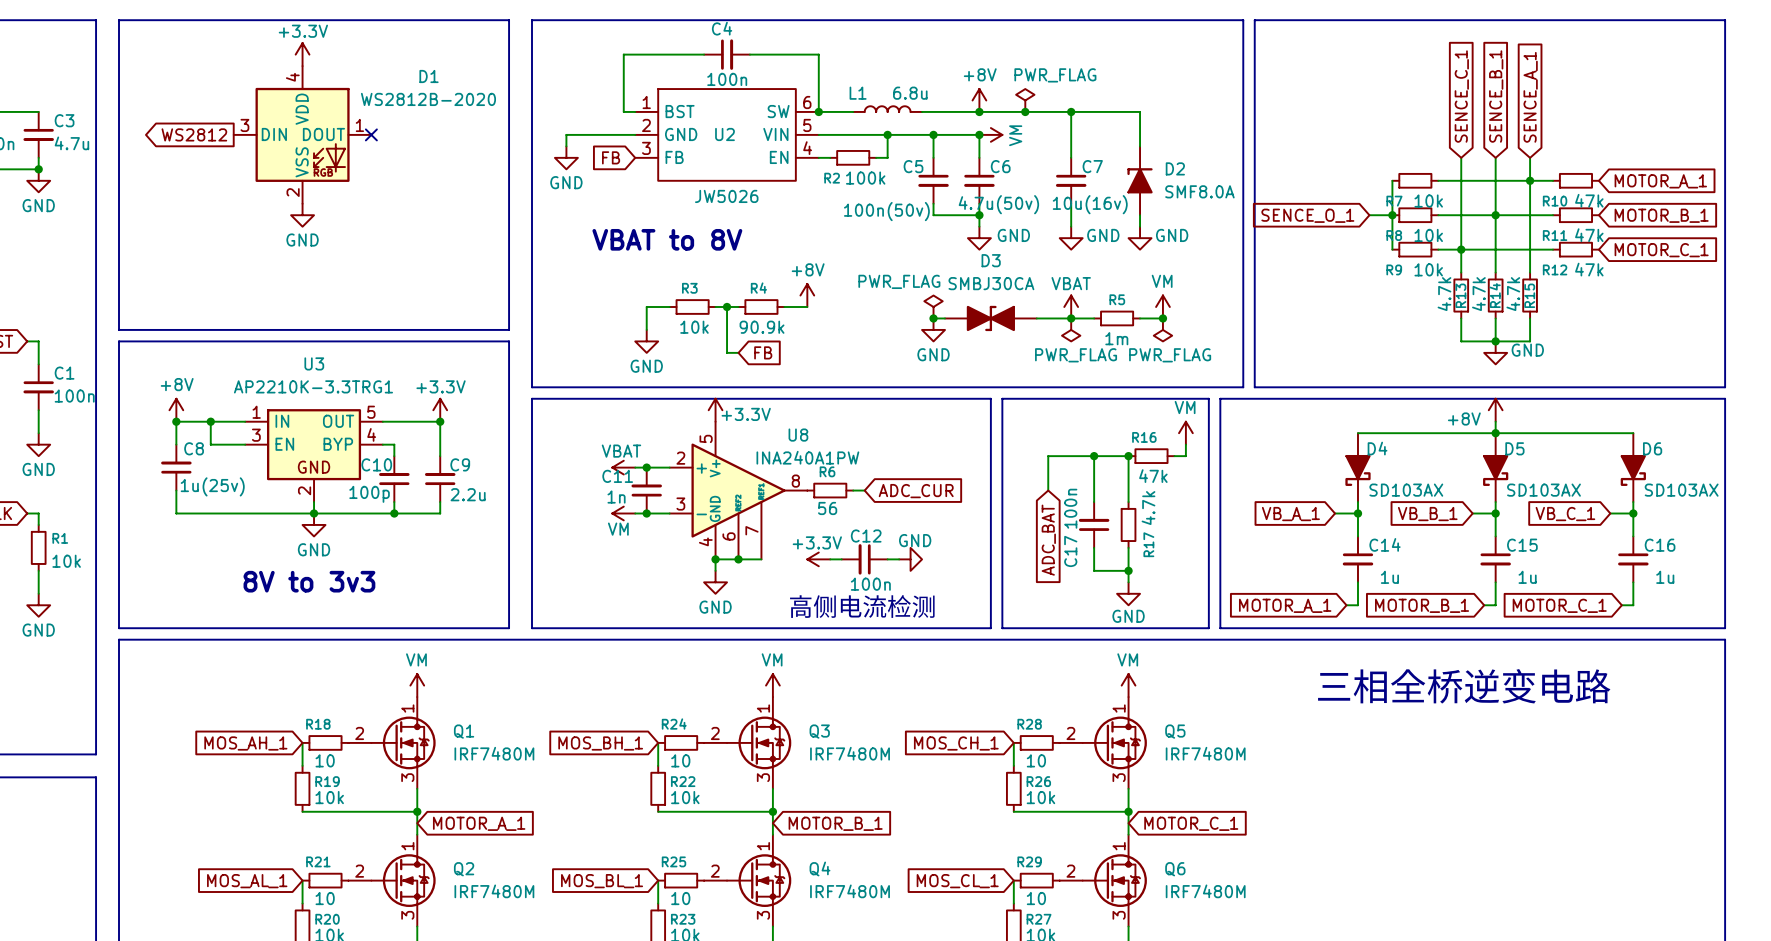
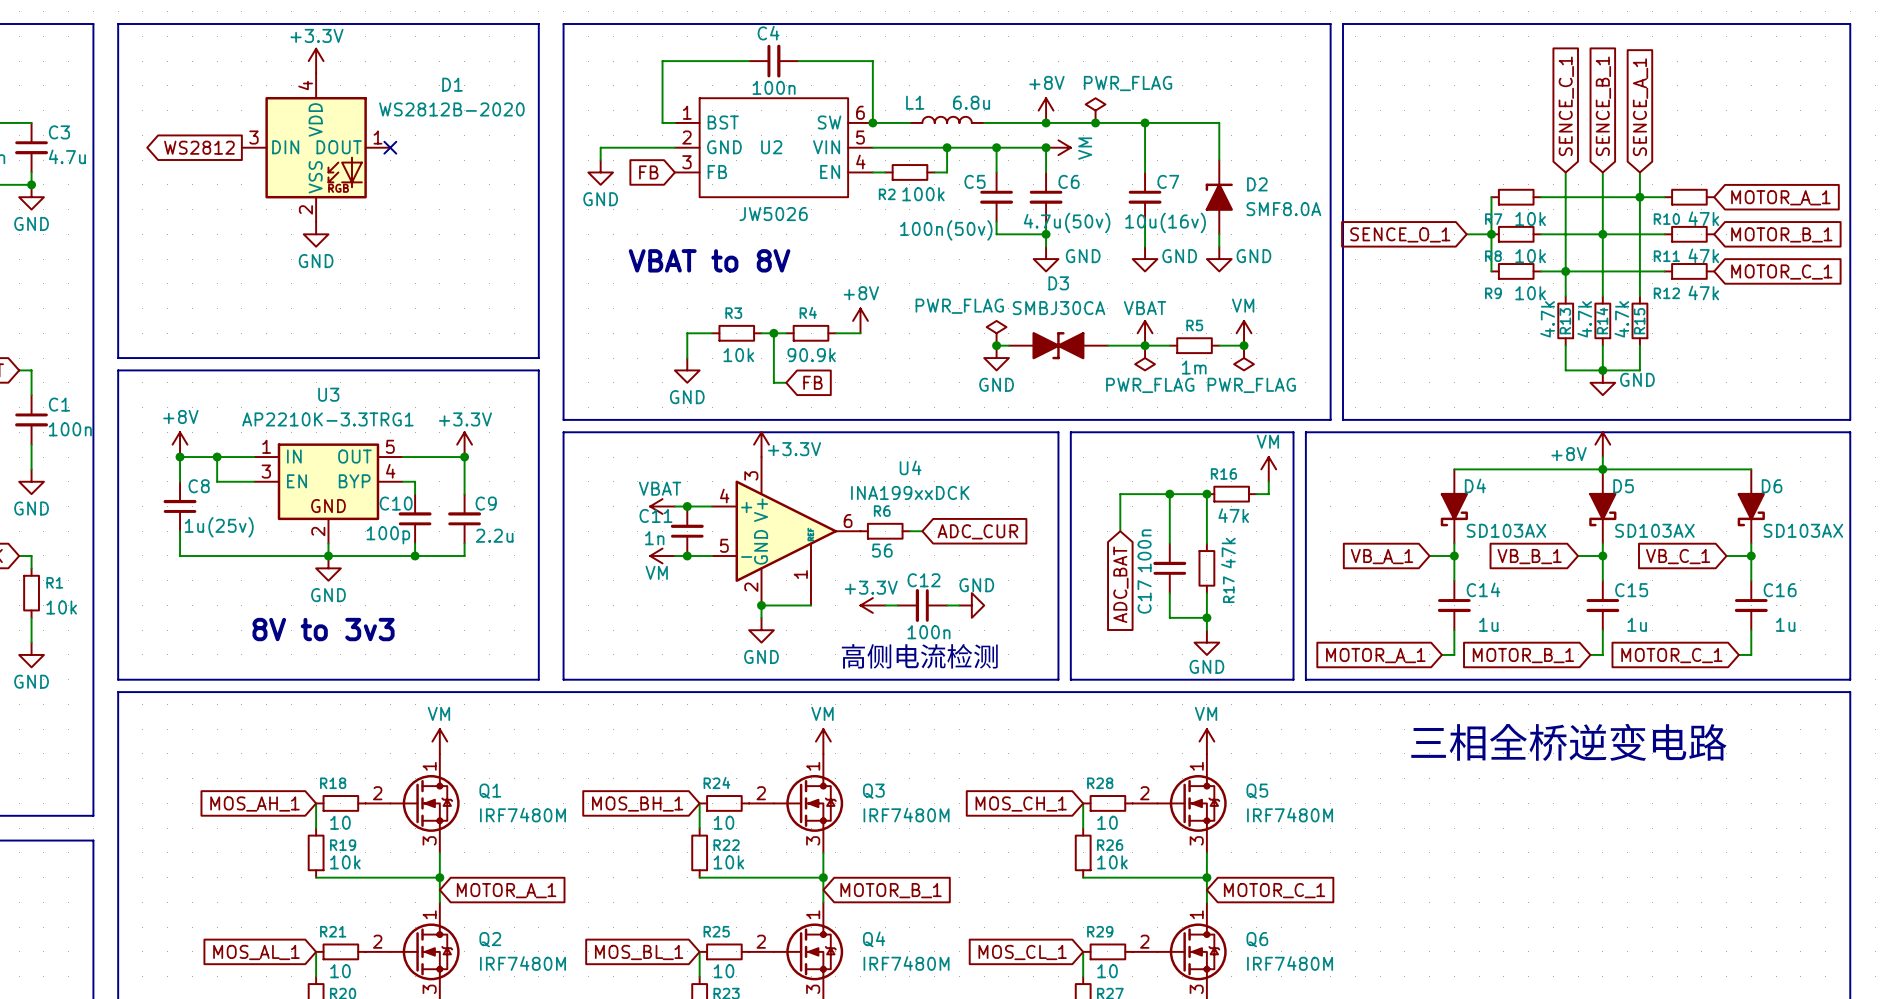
U8: INA240A1PW (738, 490) -> none
U4: none -> INA199xxDCK (786, 531)
R17 value: 4.7k (1148, 508) -> 47k (1228, 553)
junction: (738, 559) -> none

